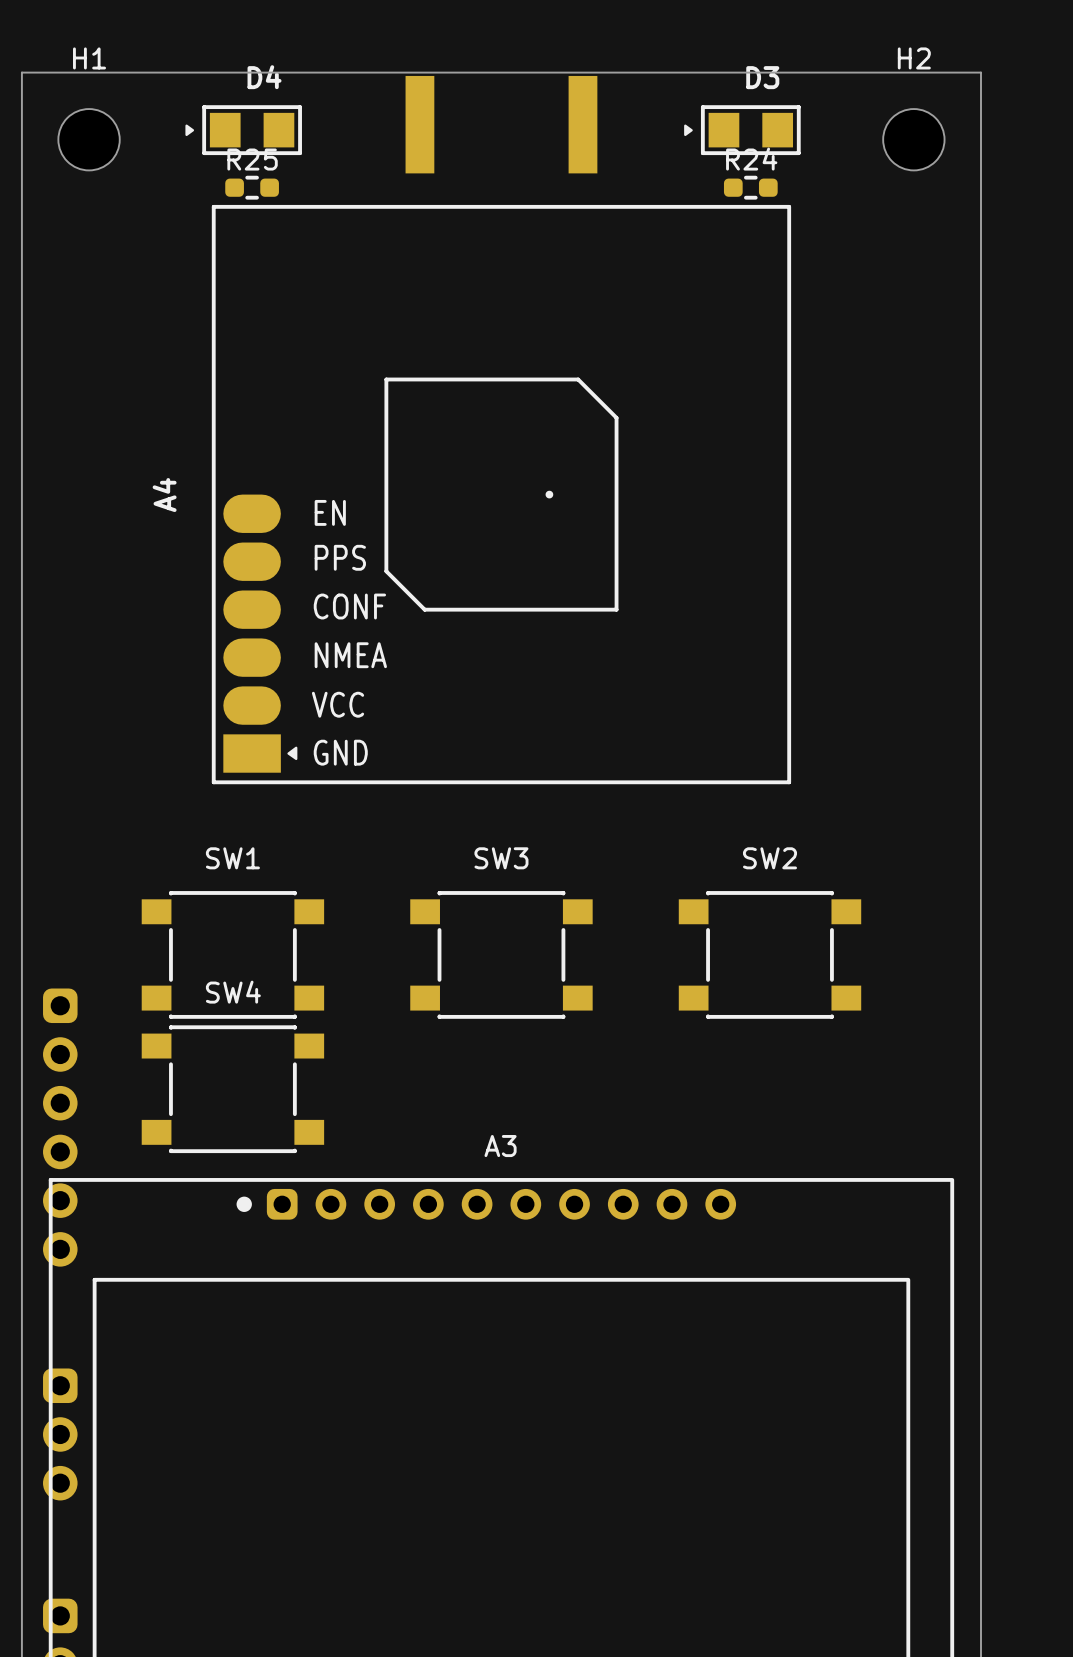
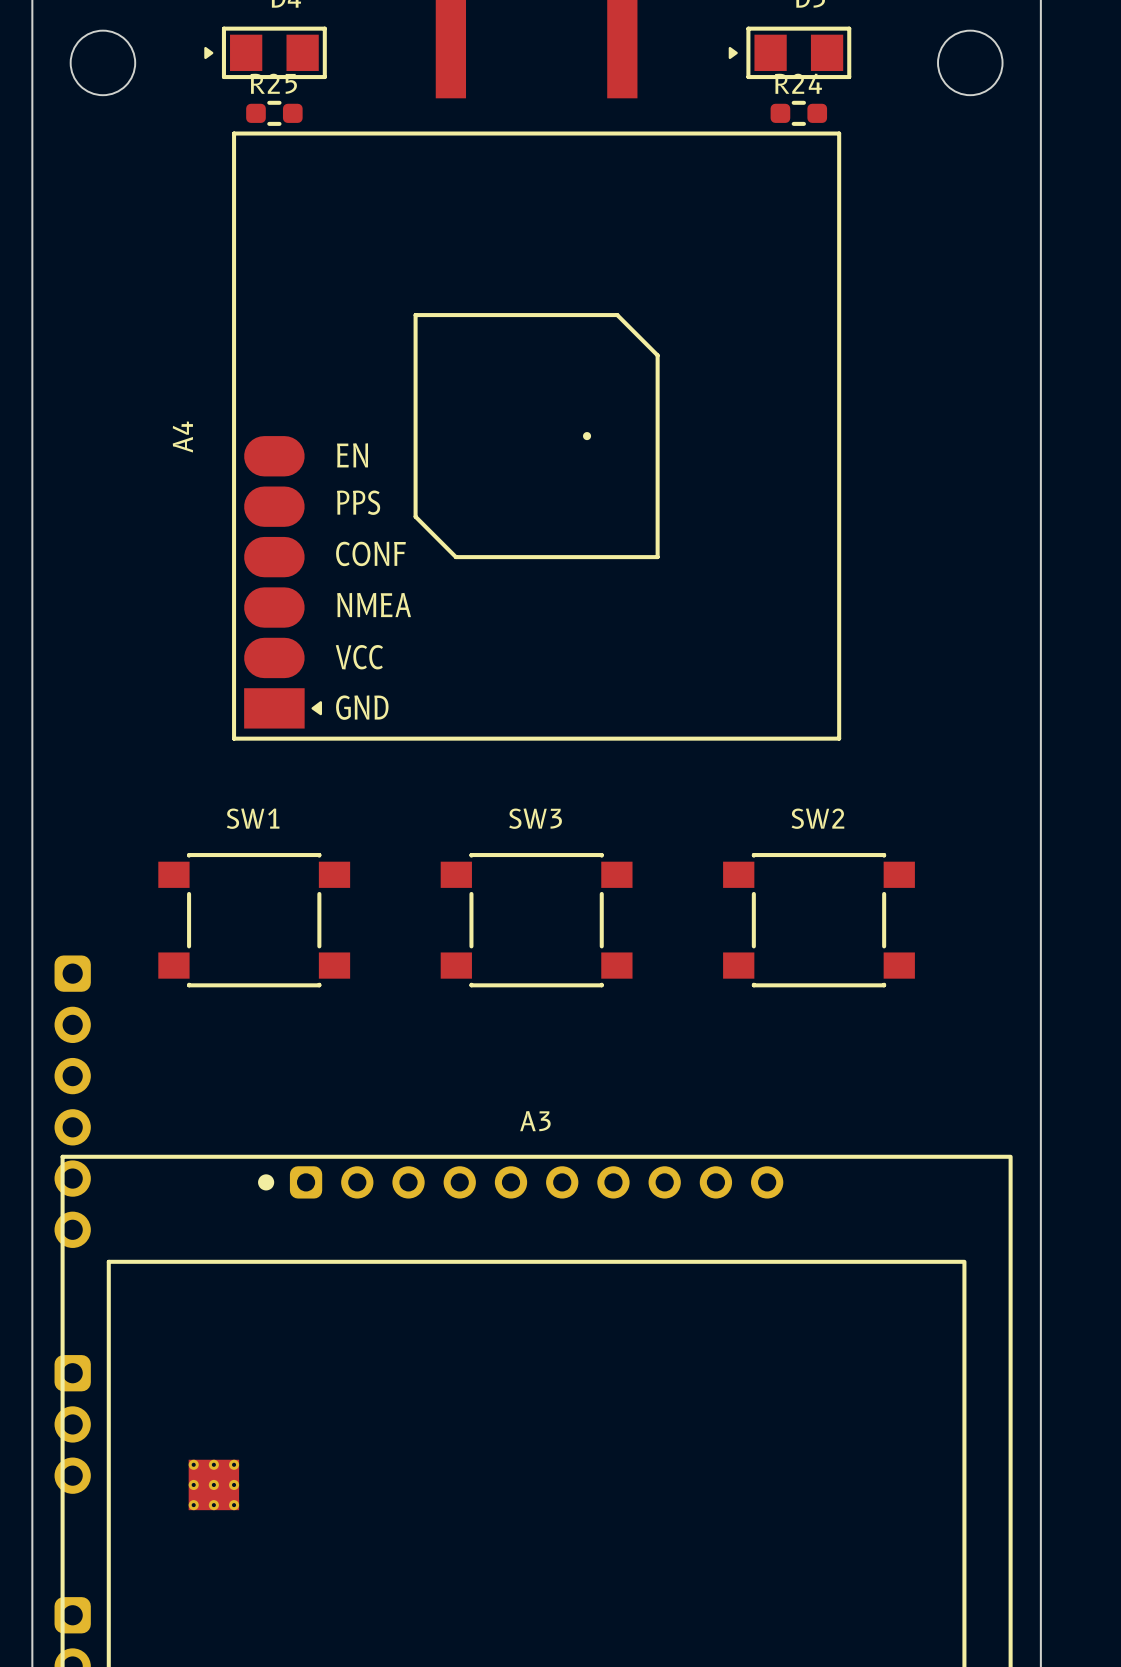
SW4: (232, 1089) -> none
part: none -> (213, 1484)

